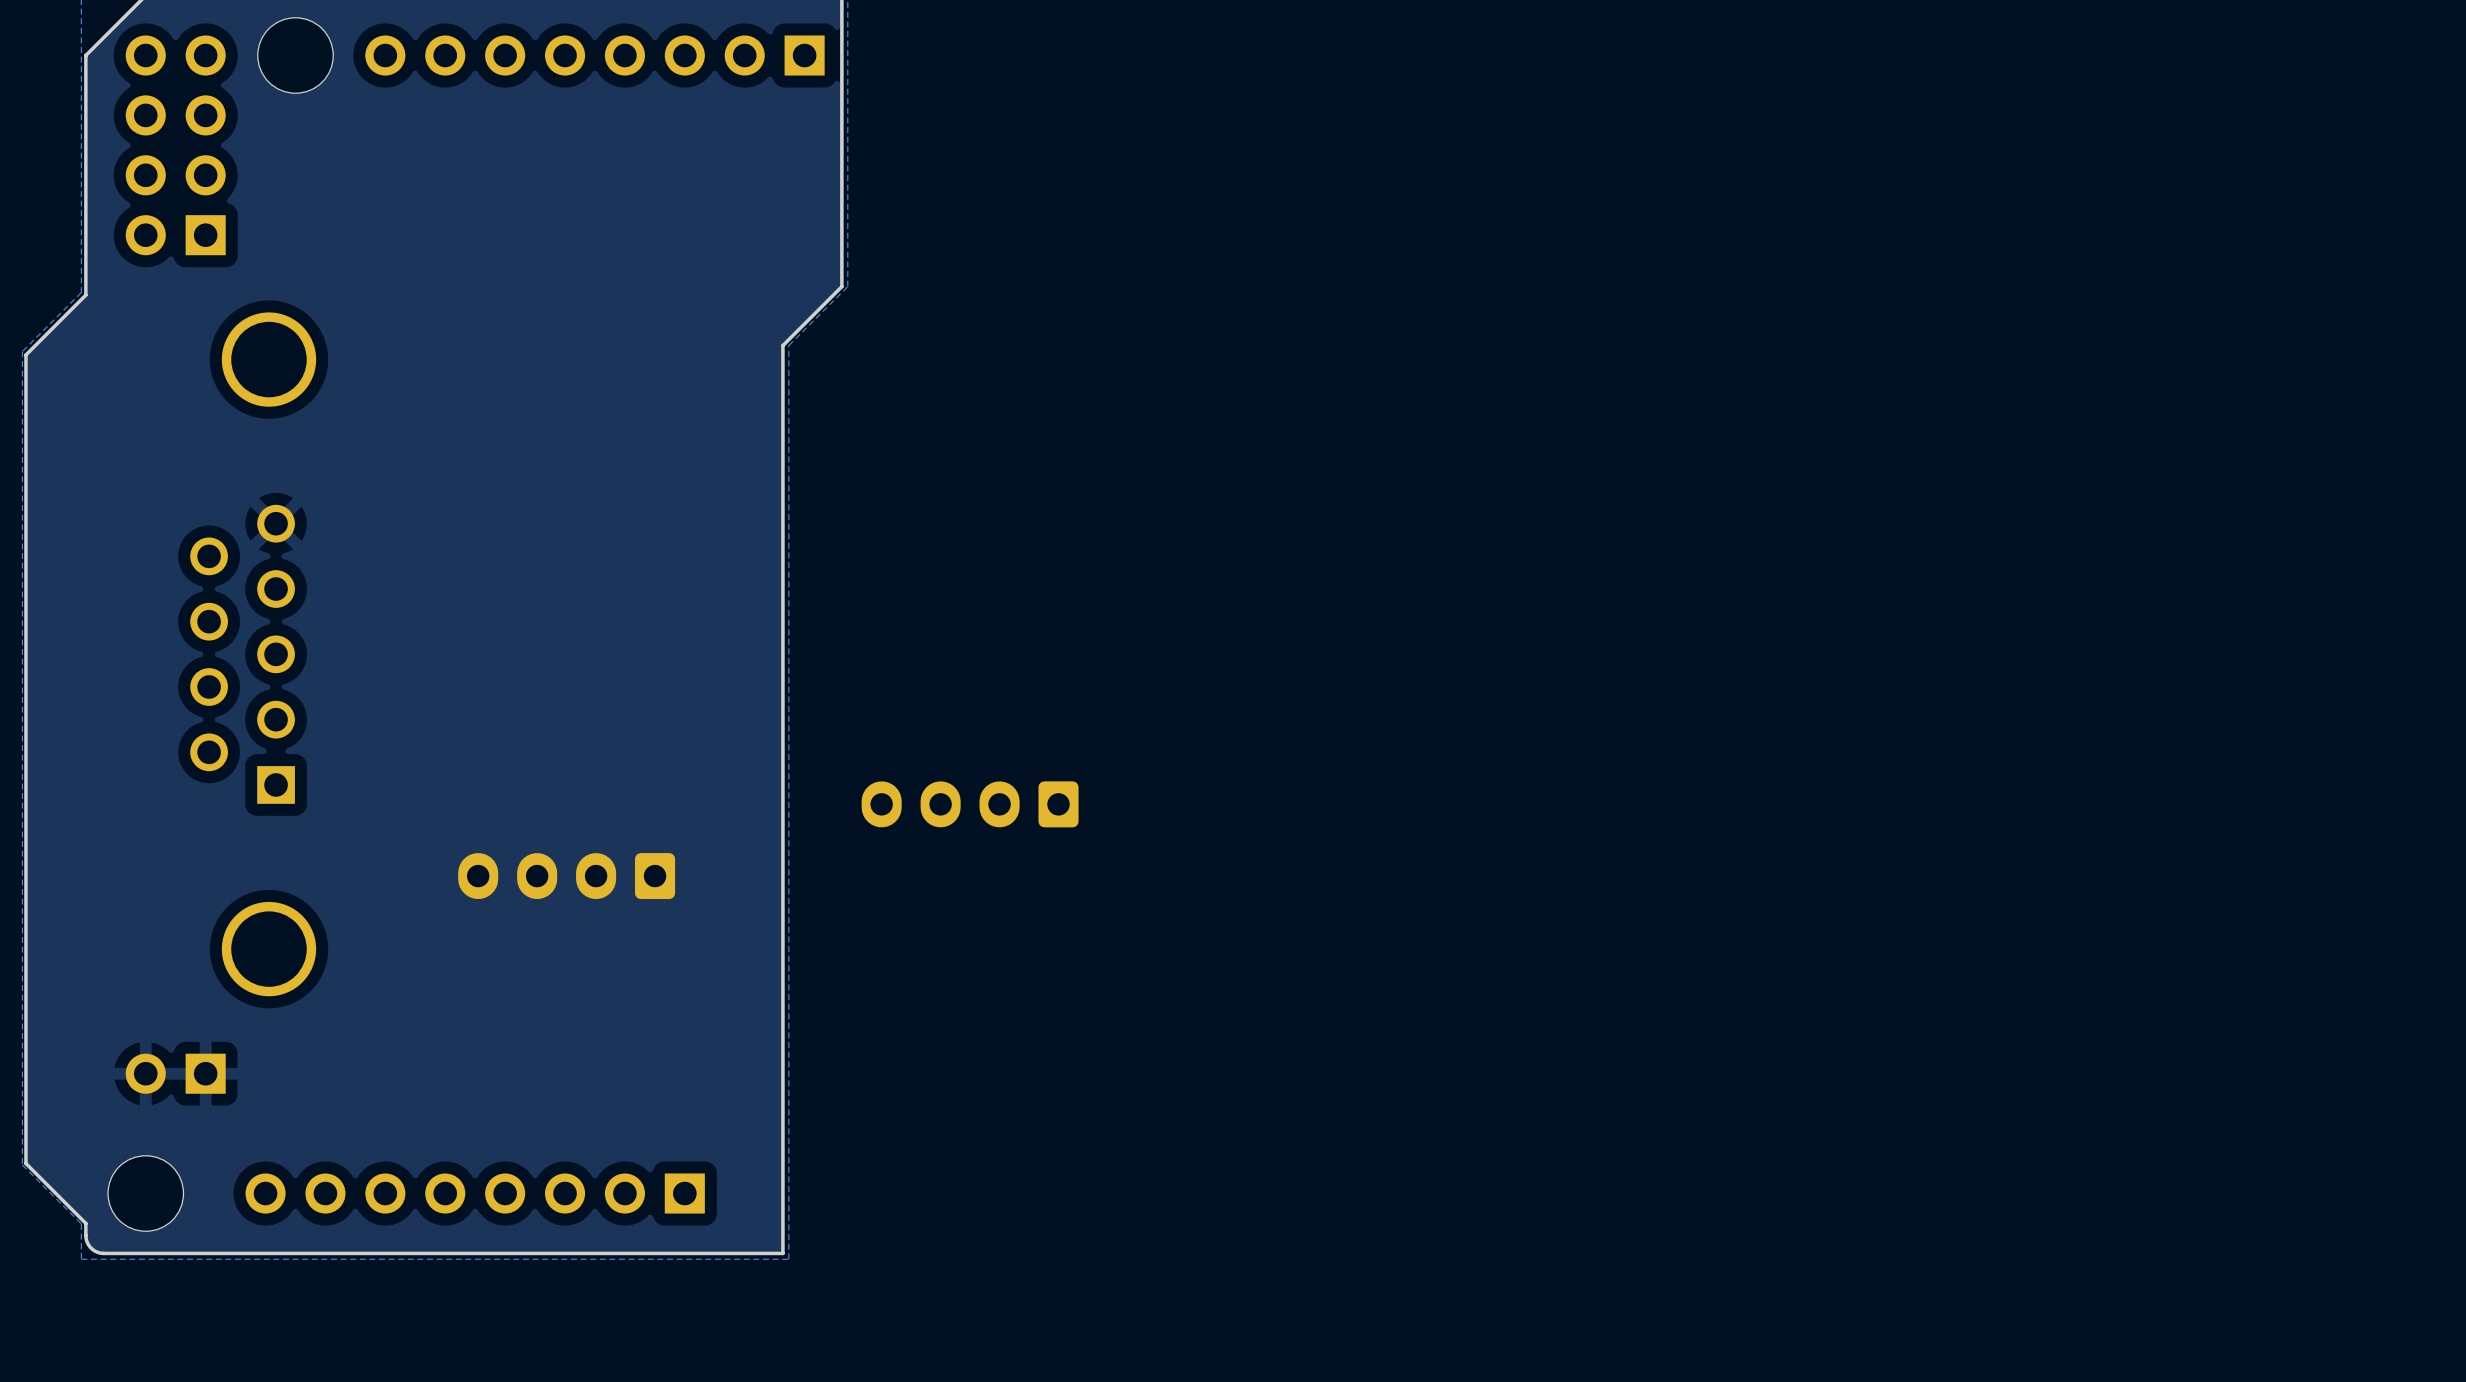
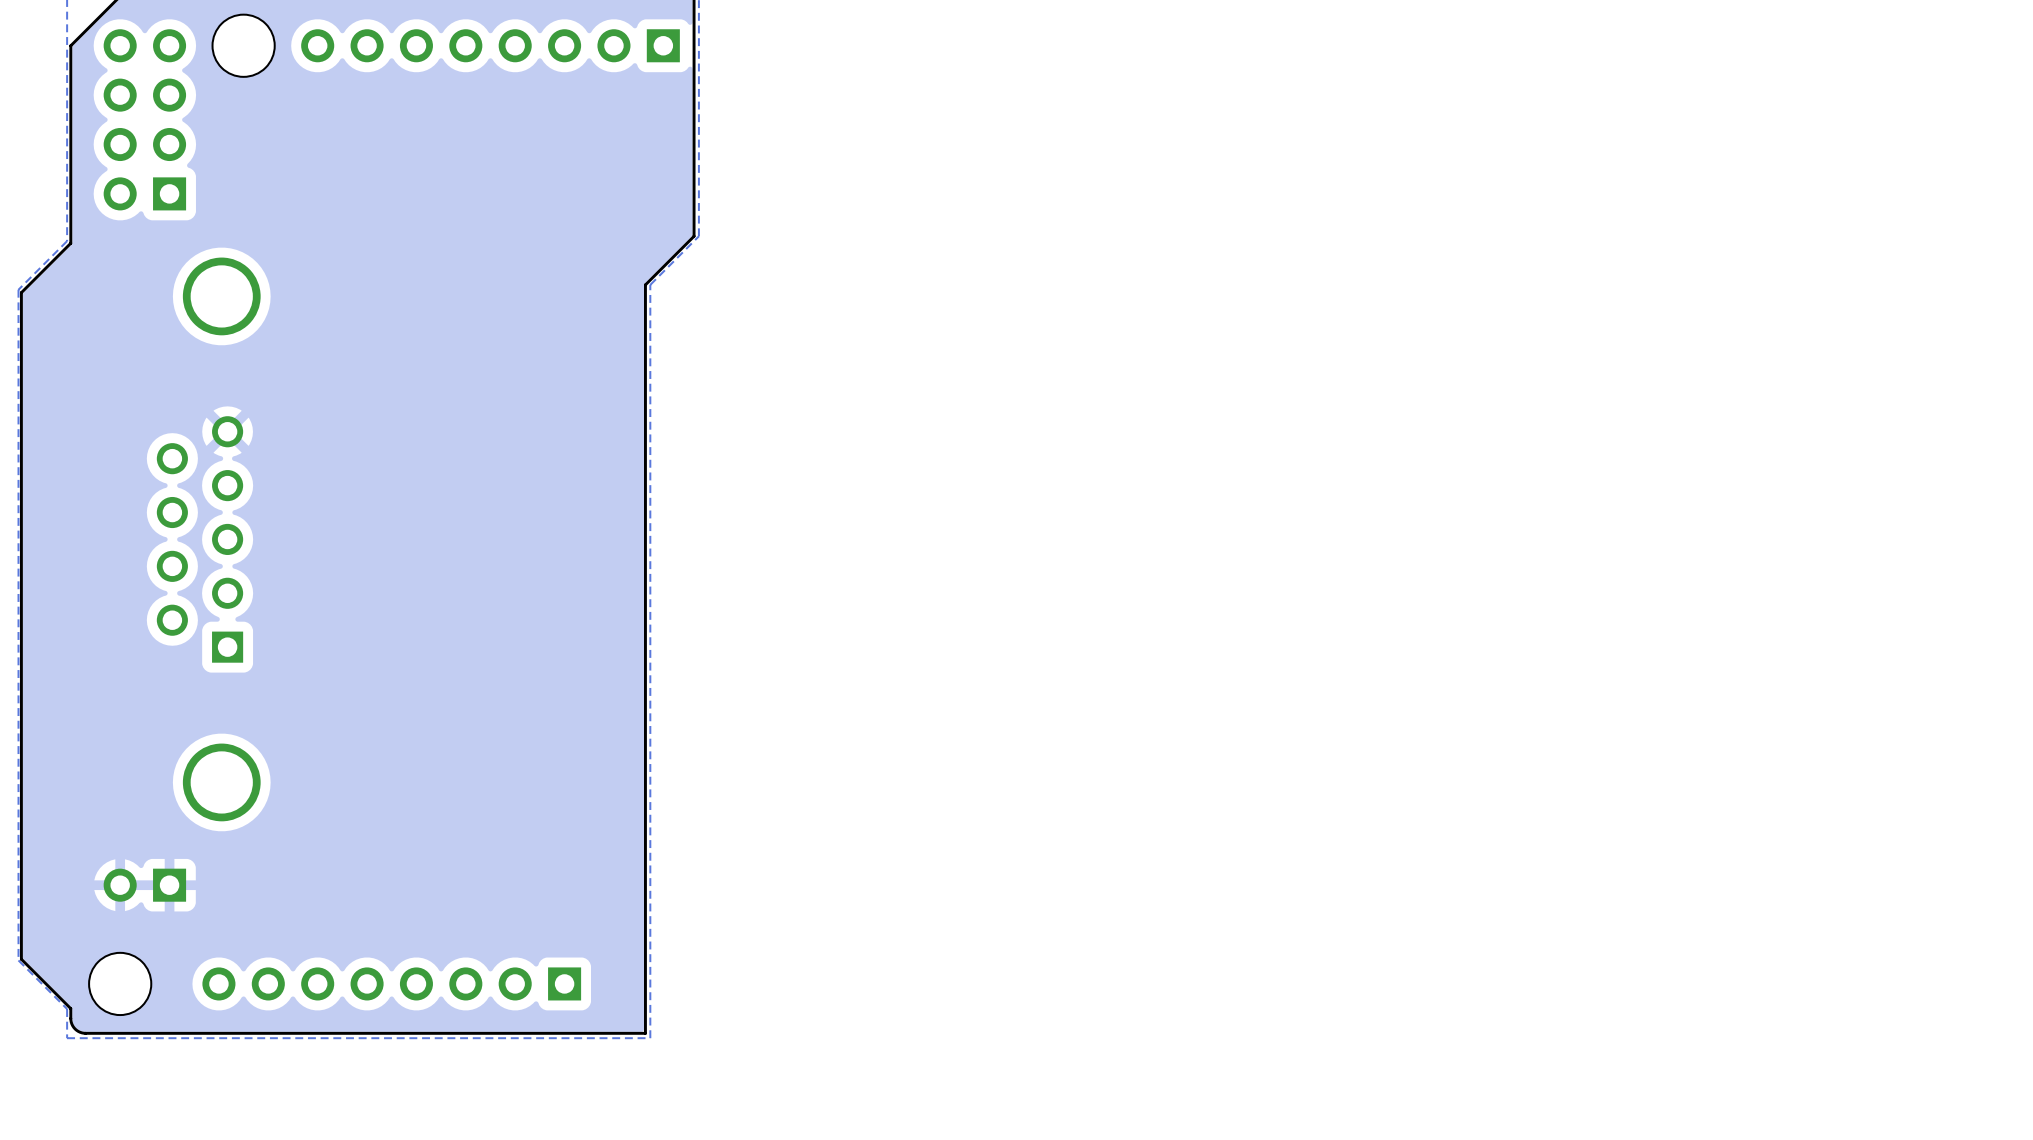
part: (970, 804) -> none
part: (566, 876) -> none

